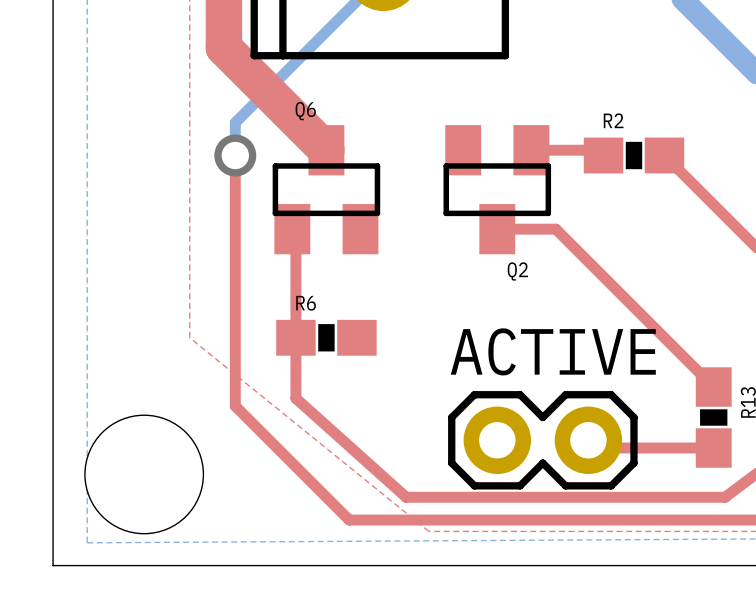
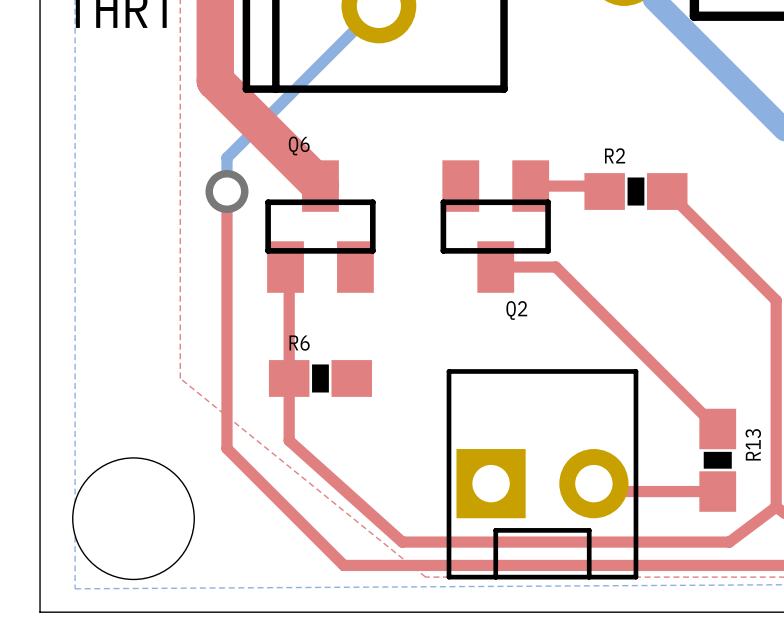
part: none -> (542, 474)
ACTIVE: (542, 440) -> none

